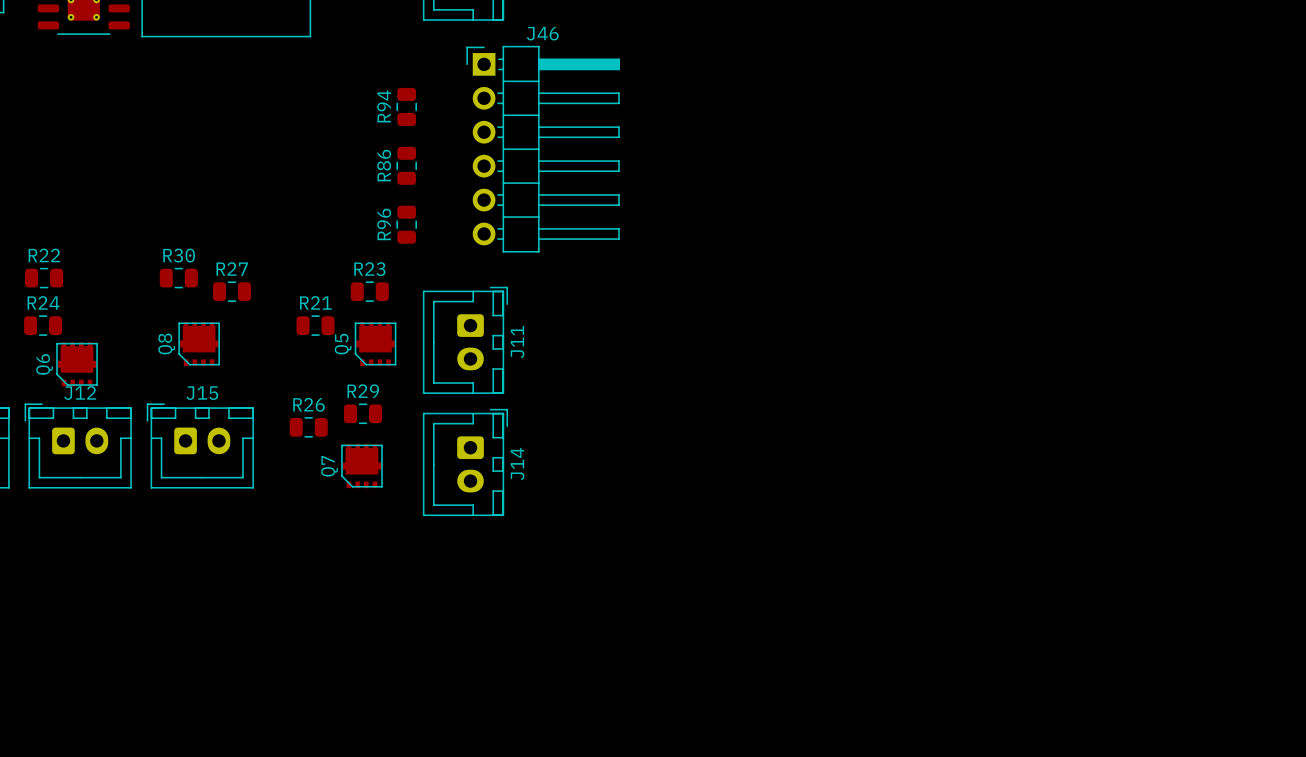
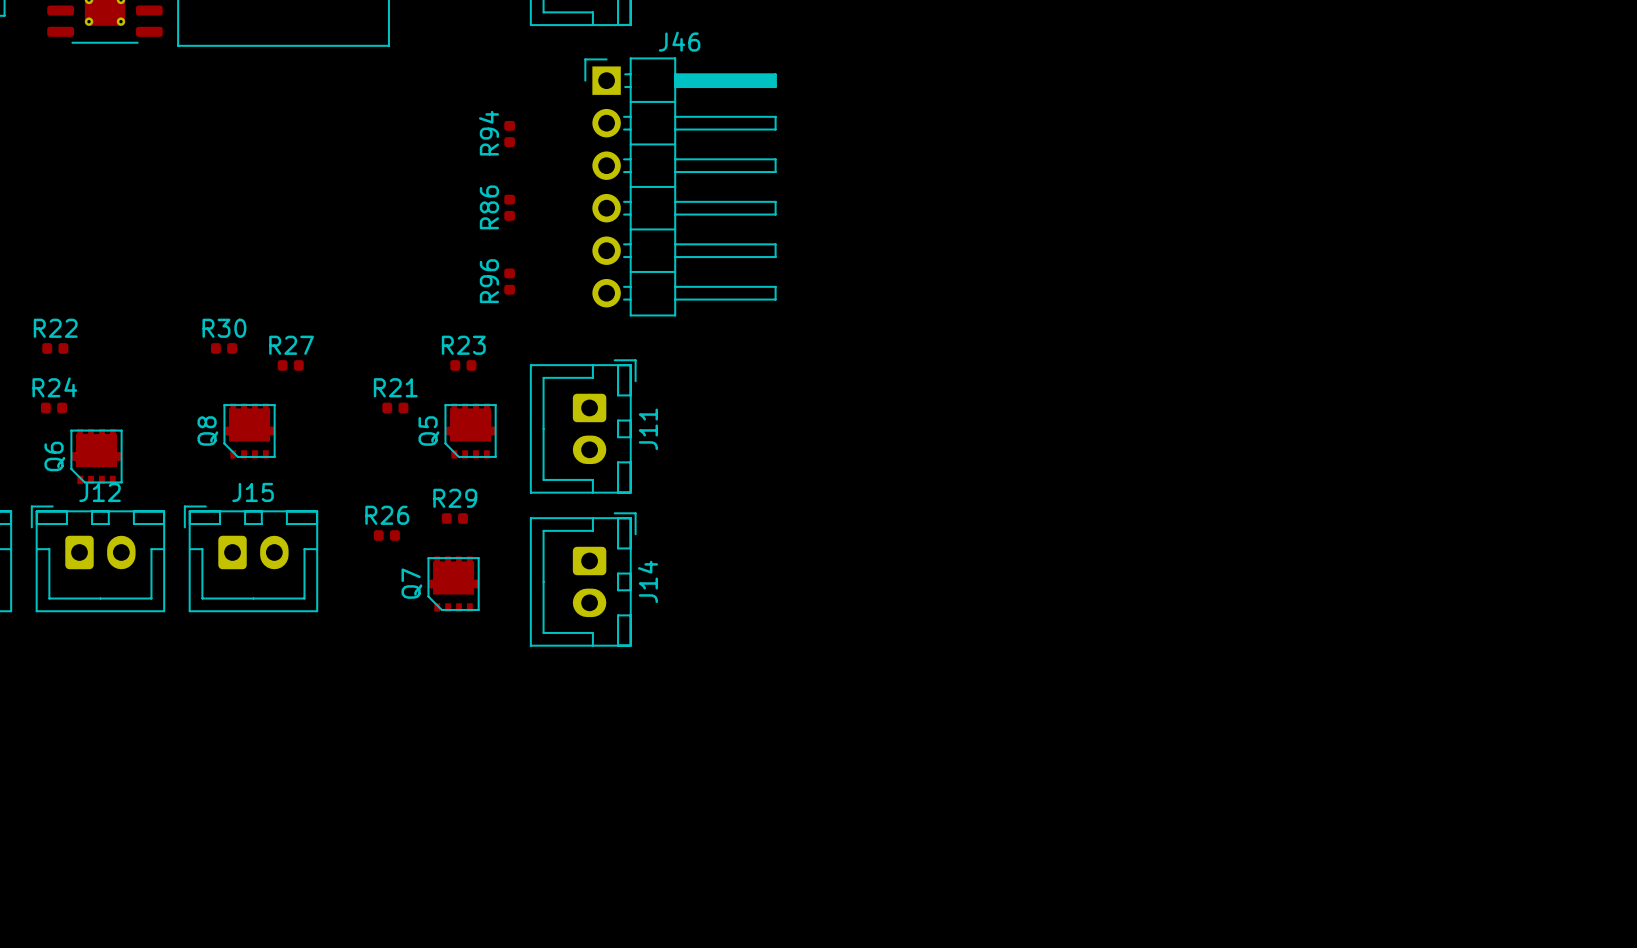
R94 footprint: [396, 87, 417, 126] -> [504, 120, 515, 148]
R86 footprint: [396, 146, 417, 185] -> [504, 194, 515, 221]
R96 footprint: [396, 205, 417, 244] -> [504, 268, 515, 295]
R22 footprint: [25, 267, 64, 289] -> [42, 343, 69, 354]
R30 footprint: [159, 267, 198, 289] -> [210, 343, 238, 354]
R27 footprint: [212, 281, 252, 302] -> [277, 360, 304, 371]
R23 footprint: [350, 281, 389, 302] -> [450, 360, 477, 371]
R24 footprint: [24, 315, 63, 336] -> [40, 402, 68, 414]
R21 footprint: [296, 315, 335, 336] -> [382, 402, 409, 414]
R29 footprint: [343, 403, 383, 425] -> [441, 513, 468, 524]
R26 footprint: [289, 417, 328, 438] -> [373, 530, 400, 541]

